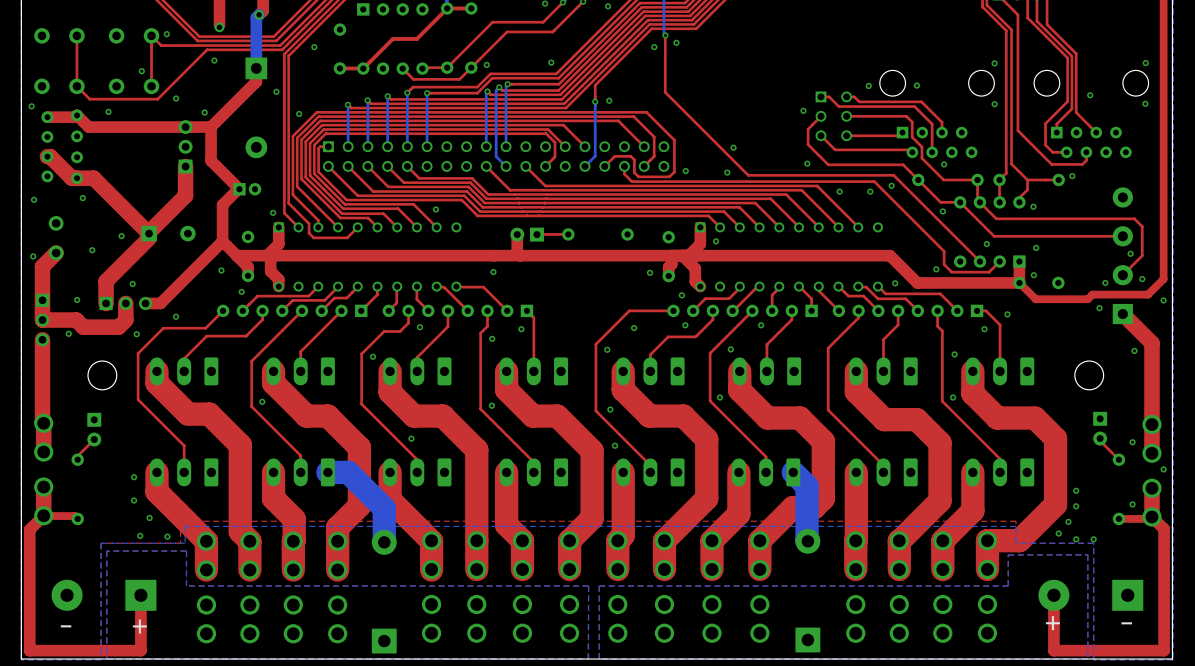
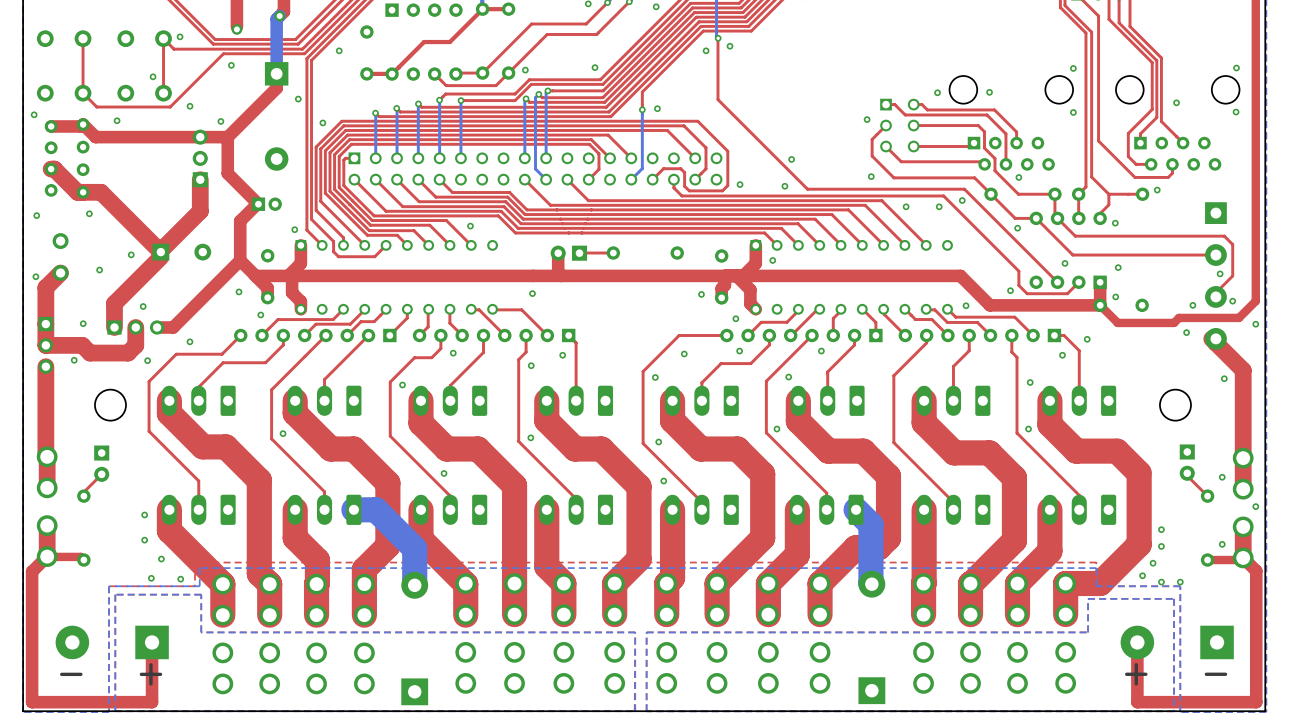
part rotation: 0° (1122, 255) -> 180° (1215, 275)

